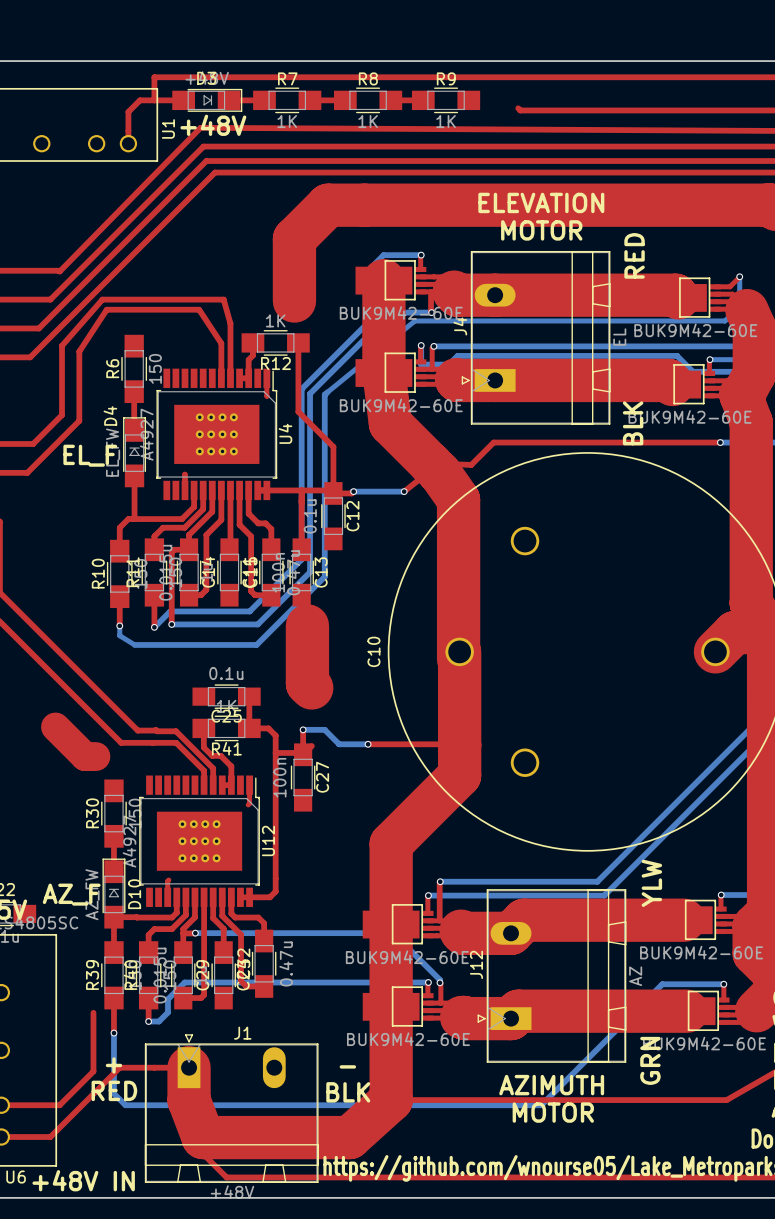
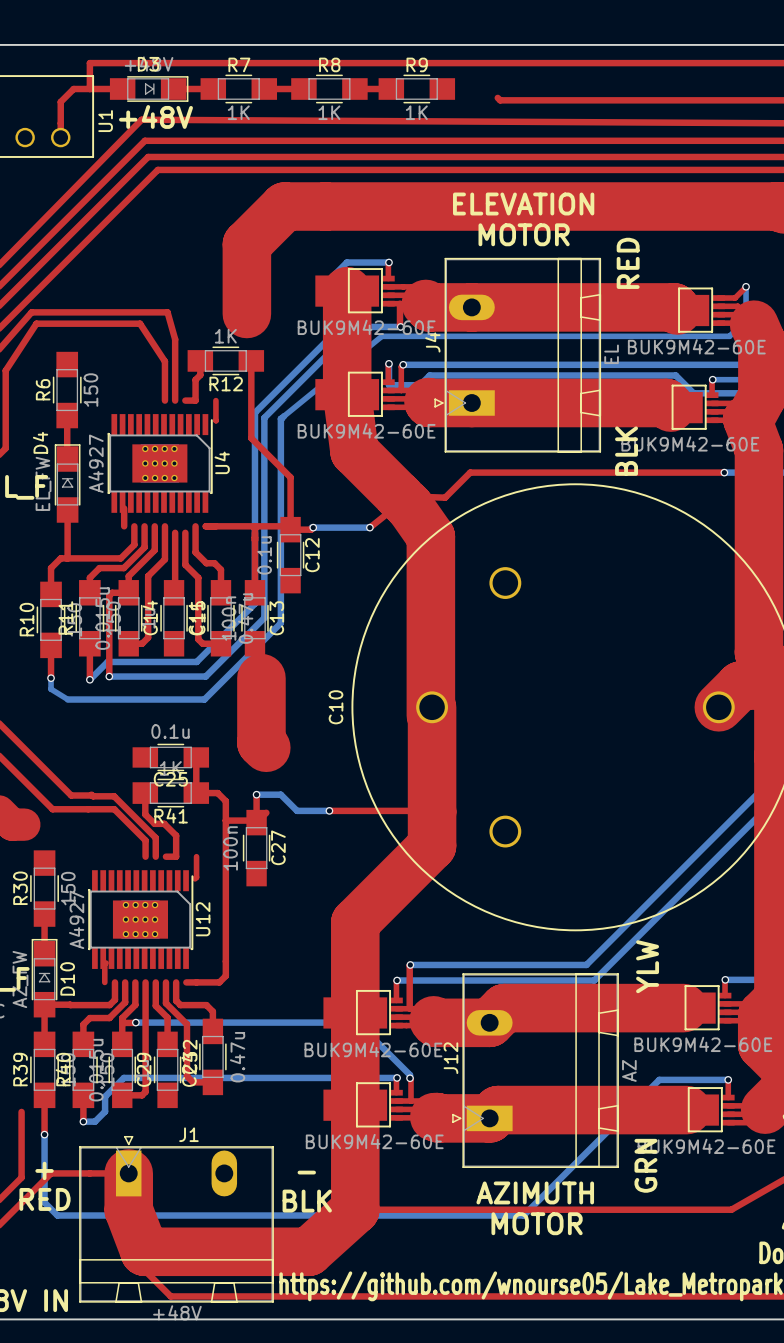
U4 footprint: [156, 368, 278, 501] -> [107, 414, 213, 513]
U12 footprint: [139, 775, 260, 907] -> [88, 870, 194, 969]

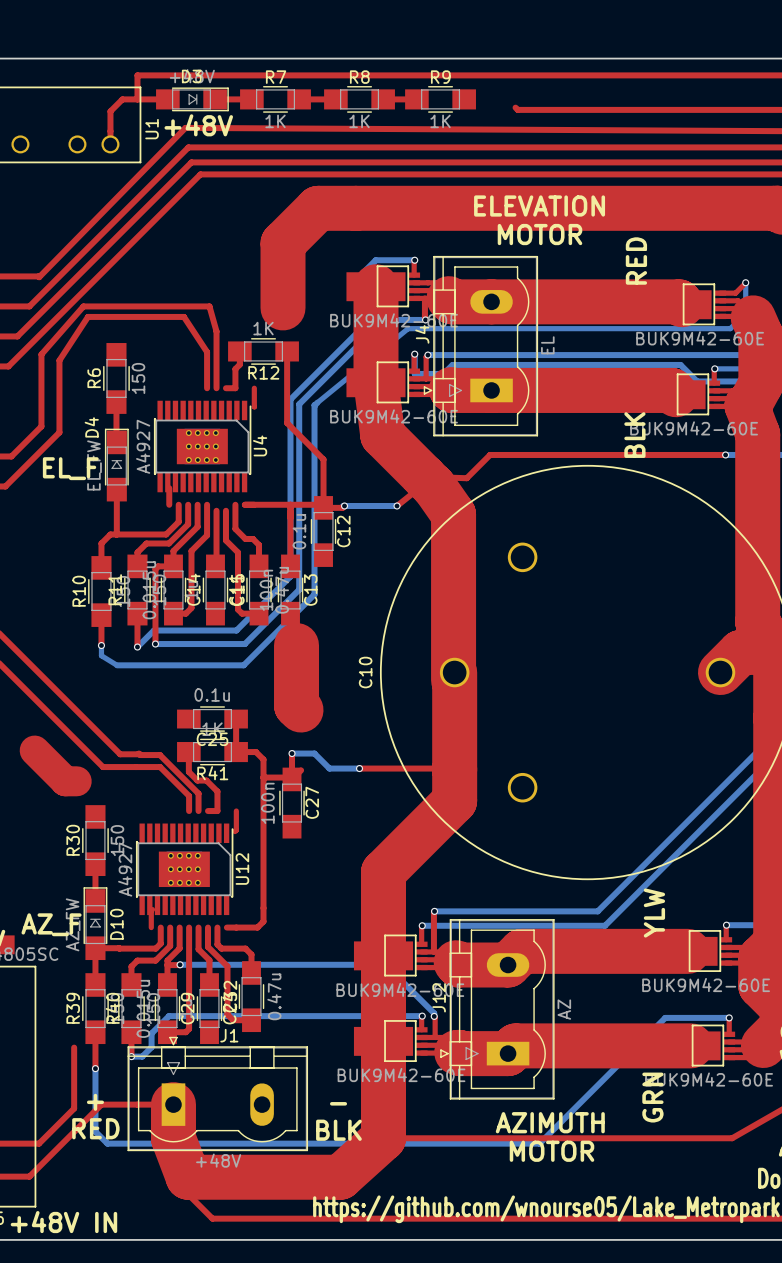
J4 footprint: [434, 257, 602, 453] -> [423, 255, 539, 437]
J12 footprint: [452, 973, 619, 1168] -> [440, 919, 555, 1100]
J1 footprint: [79, 1135, 274, 1303] -> [127, 1036, 309, 1152]

